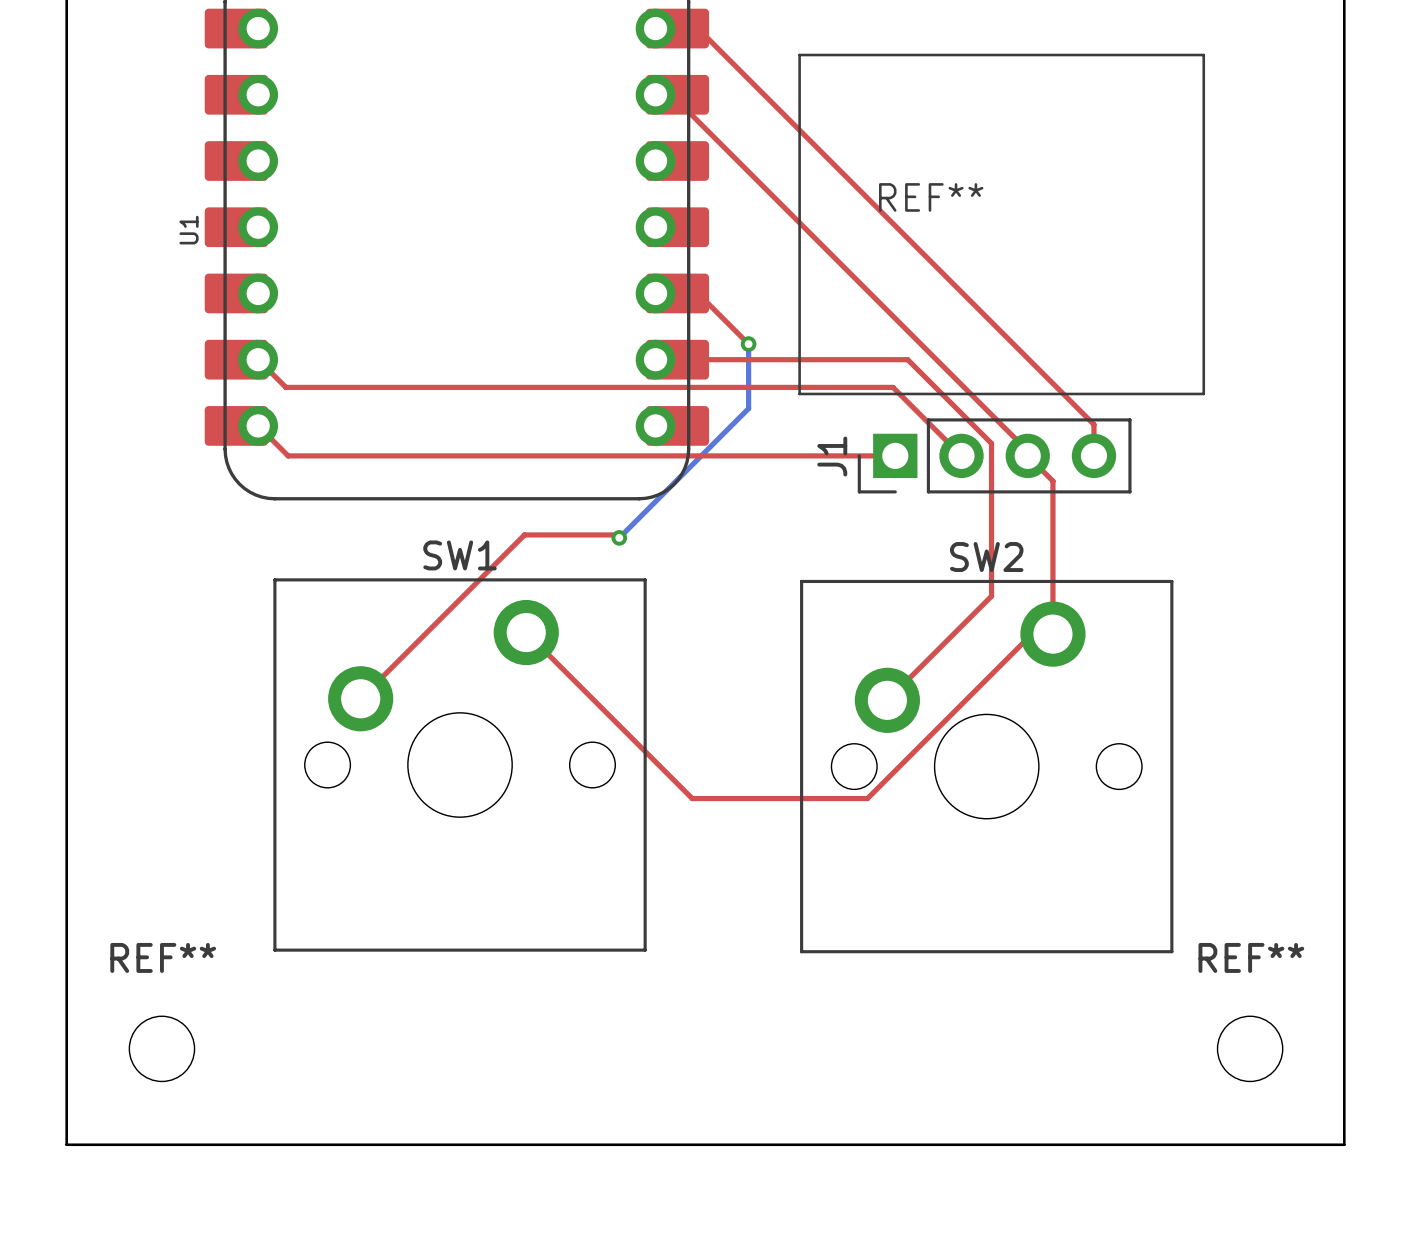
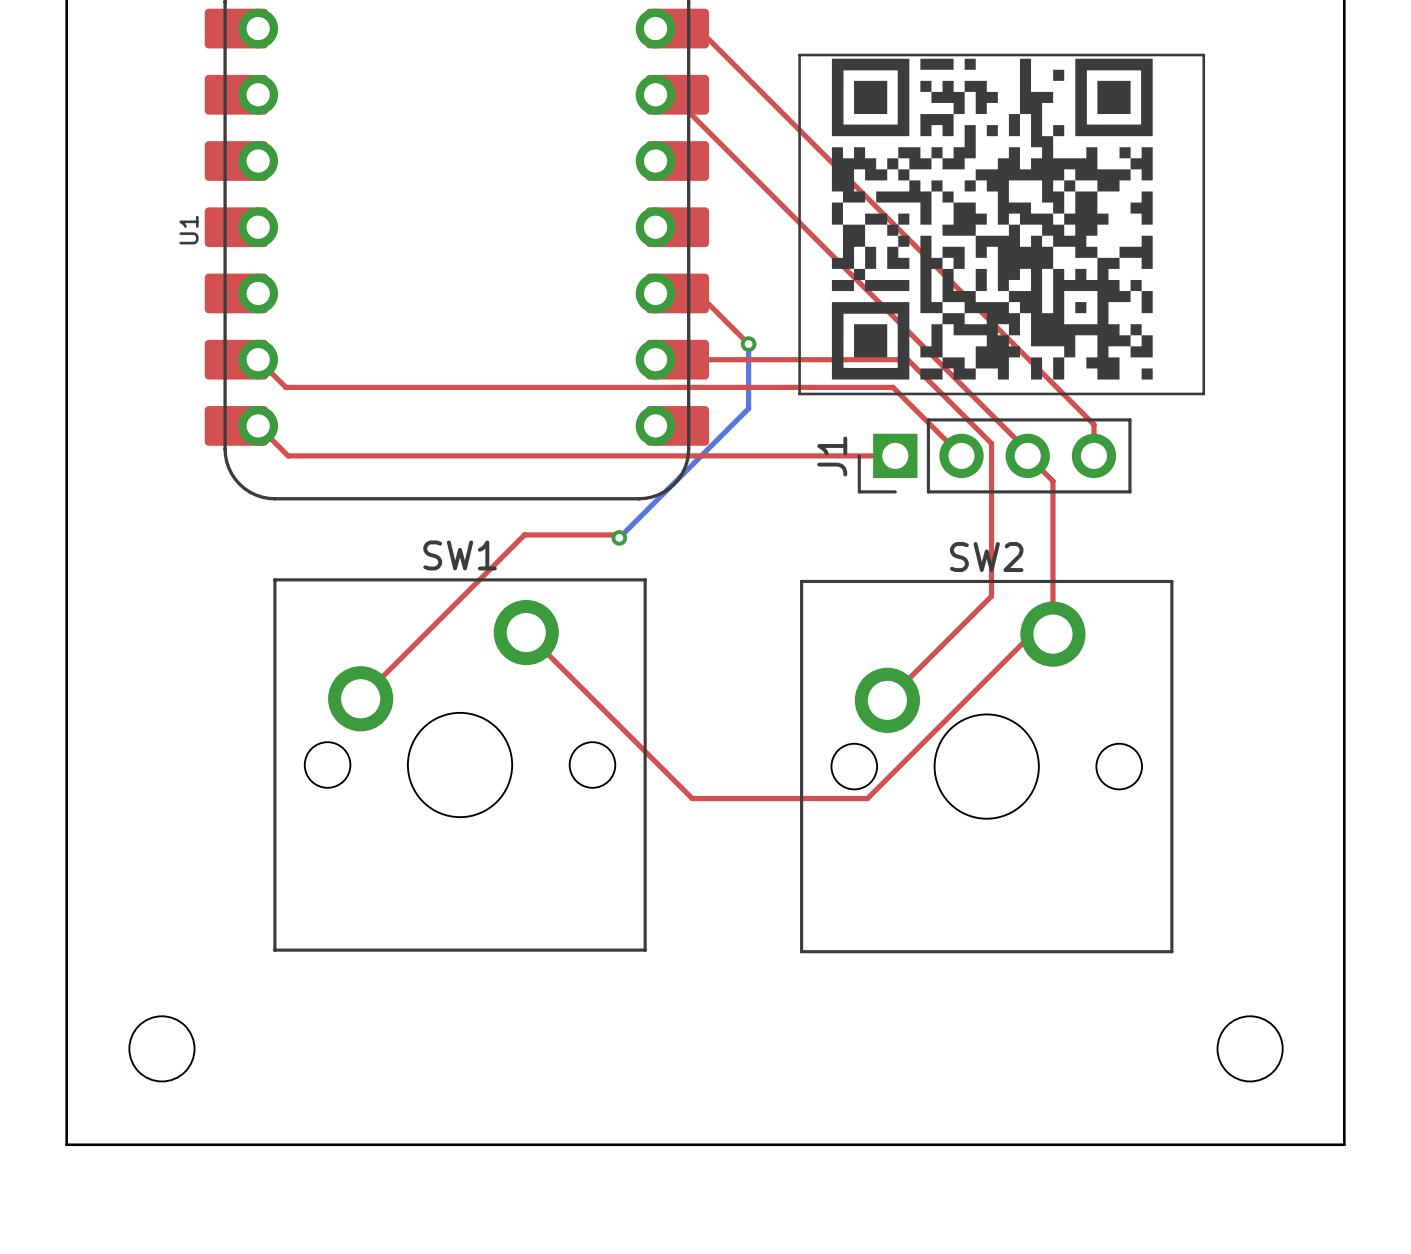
drawing: none -> [798, 53, 1206, 396]
REF**: (1001, 224) -> none
REF** name: REF** (163, 957) -> none
REF** name: REF** (1251, 957) -> none

